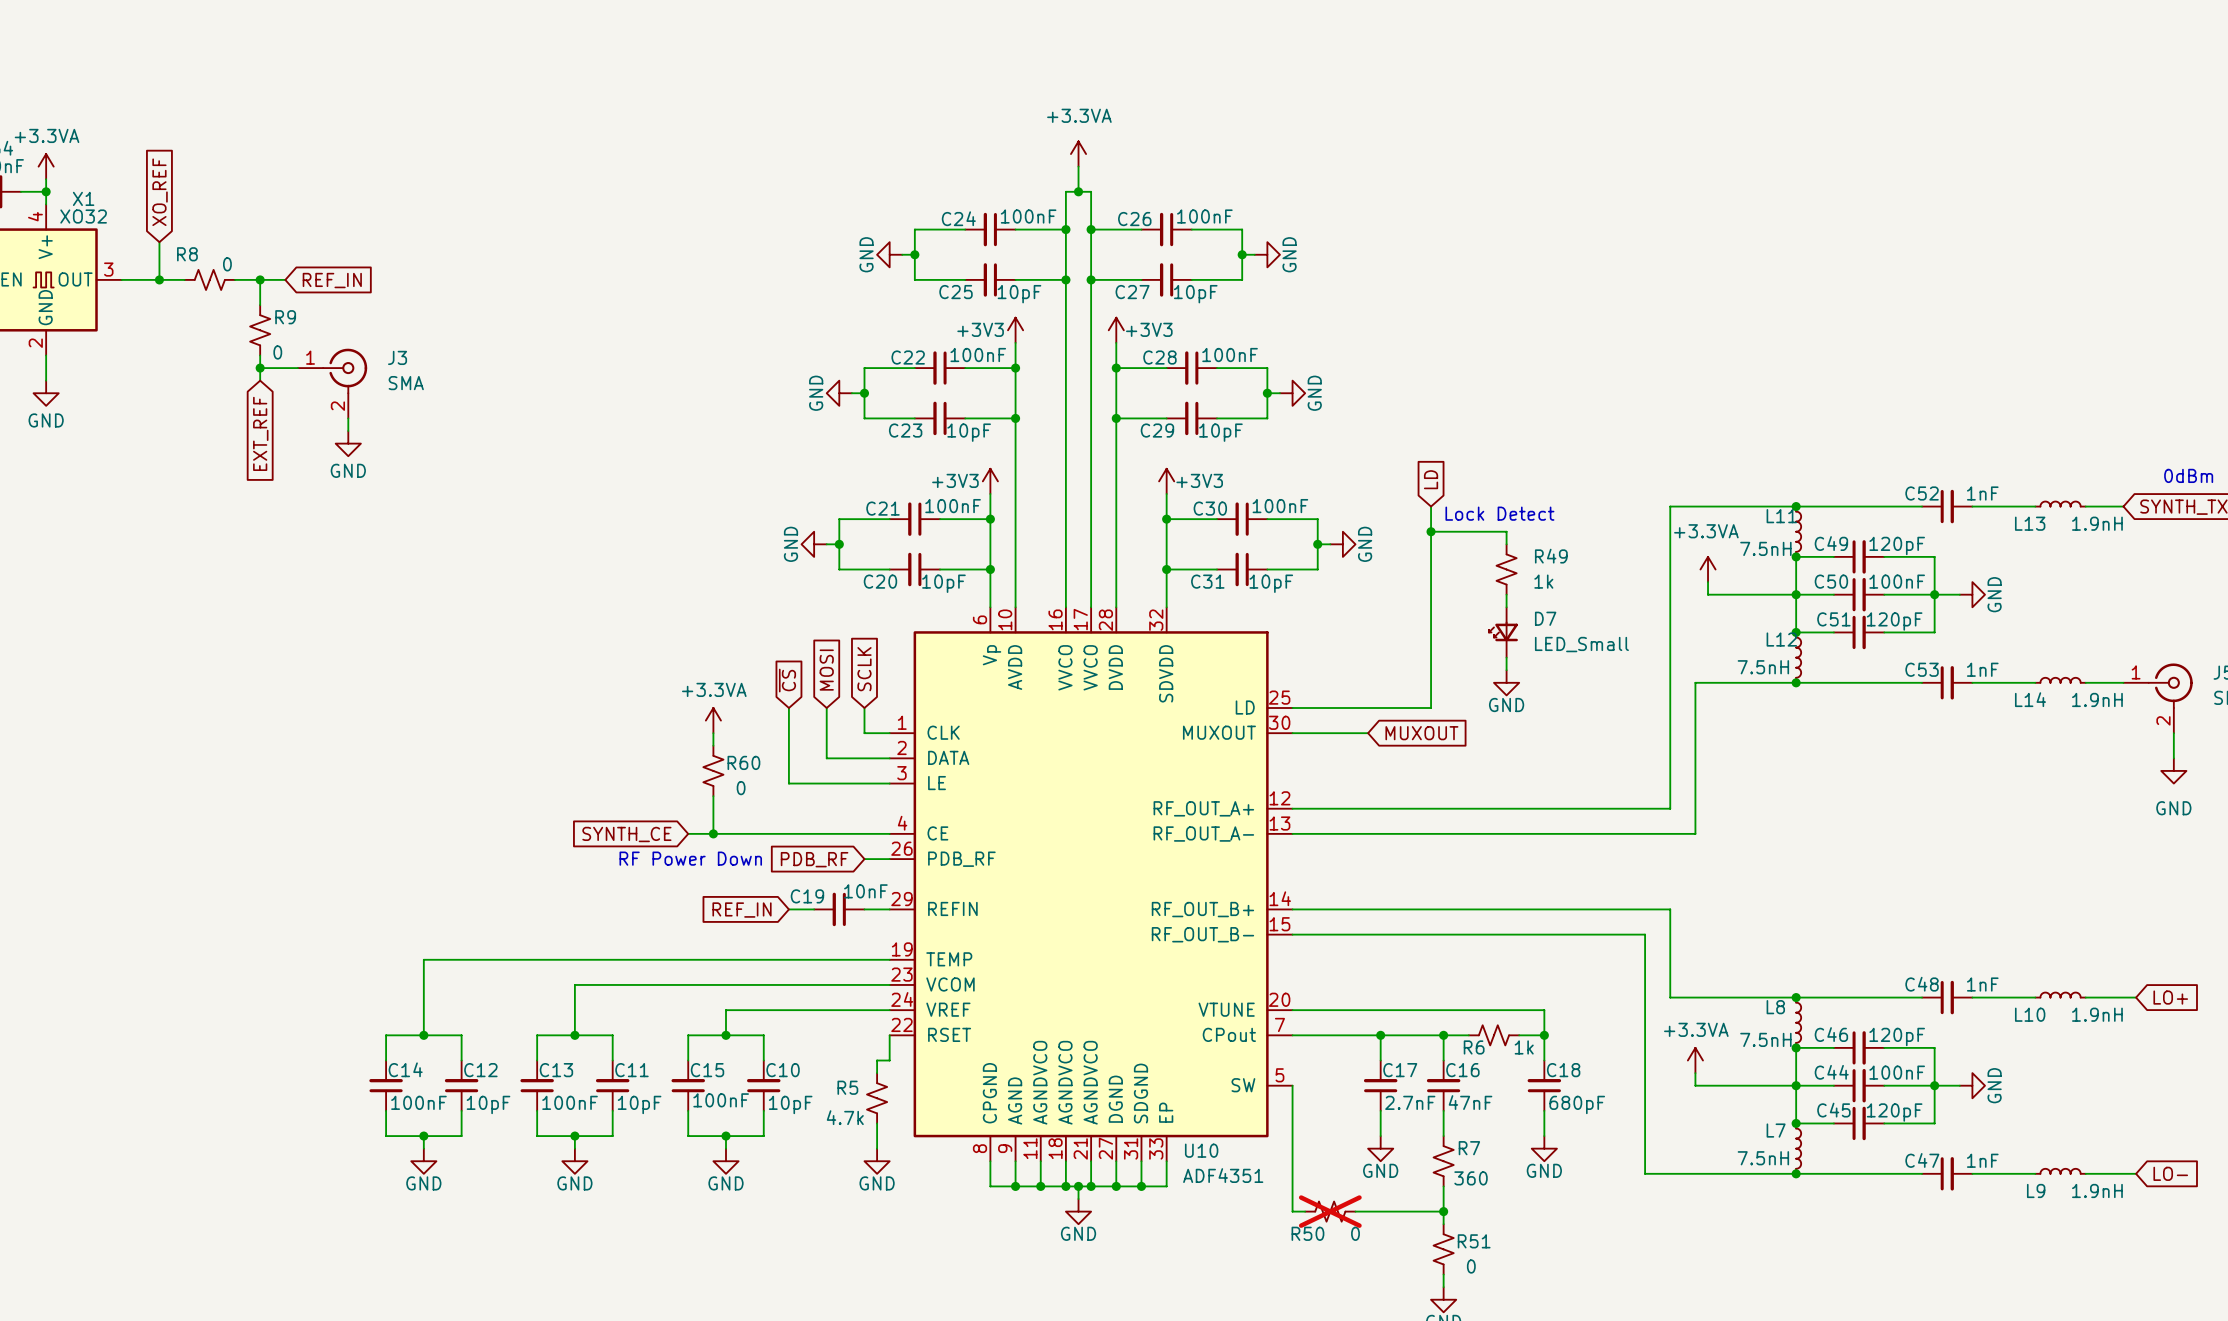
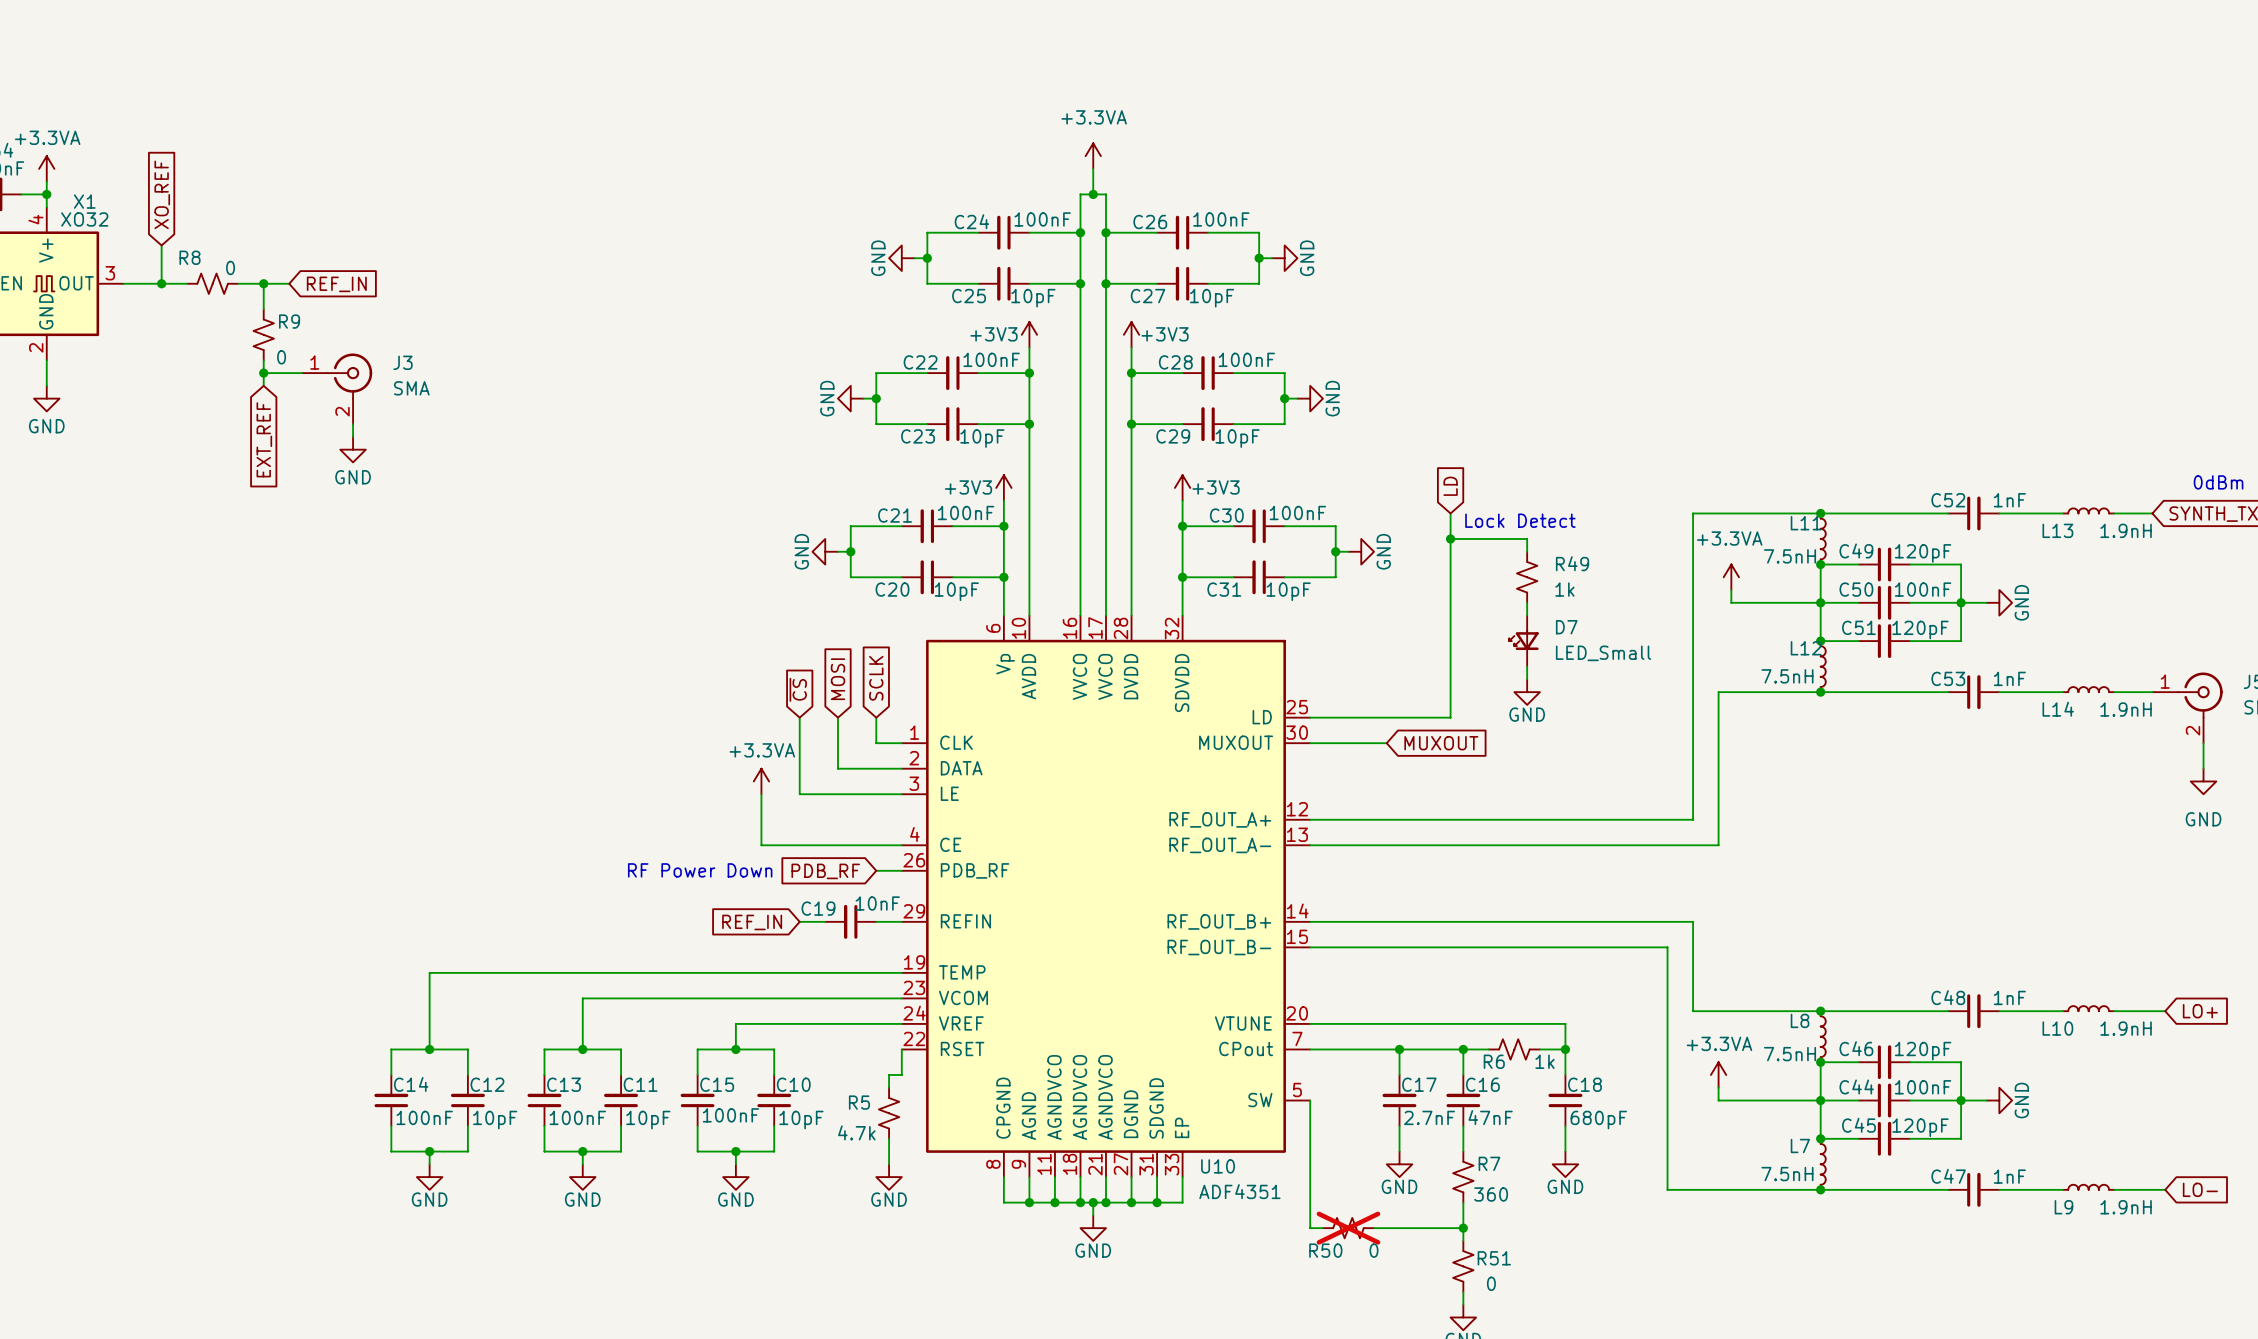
power symbol position: +3.3VA (713, 720) -> +3.3VA (761, 781)
wire: (713, 733) (713, 745) -> none
R60: 0 (713, 770) -> none
wire: (713, 796) (713, 833) -> none
wire: (688, 833) (751, 833) -> (761, 794) (761, 845)
junction: (713, 833) -> none
global label: SYNTH_CE (626, 834) -> none

